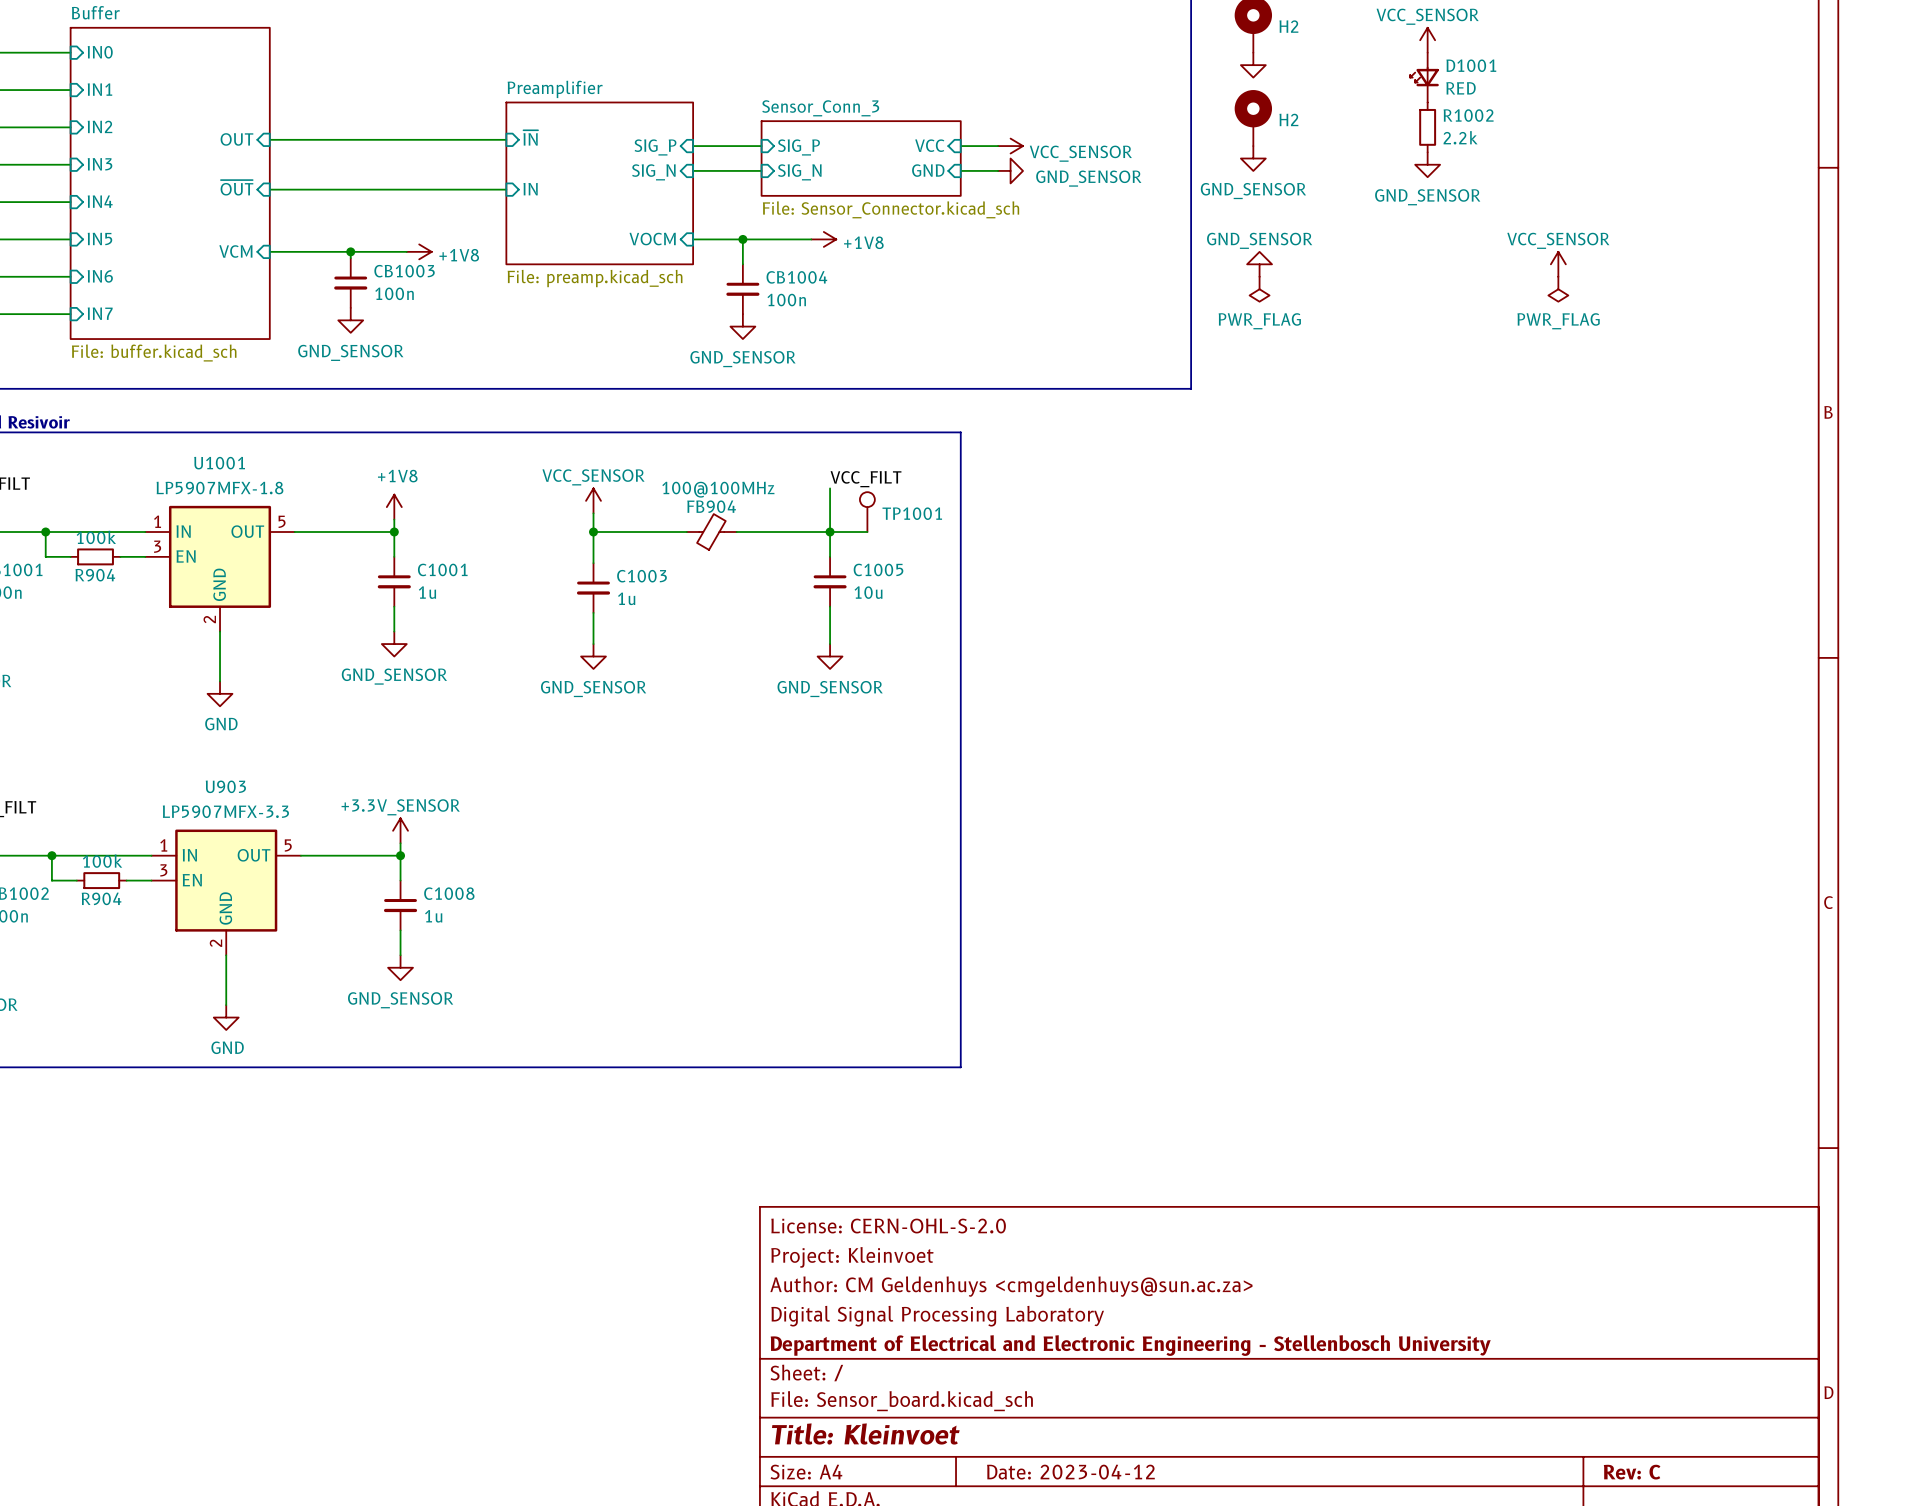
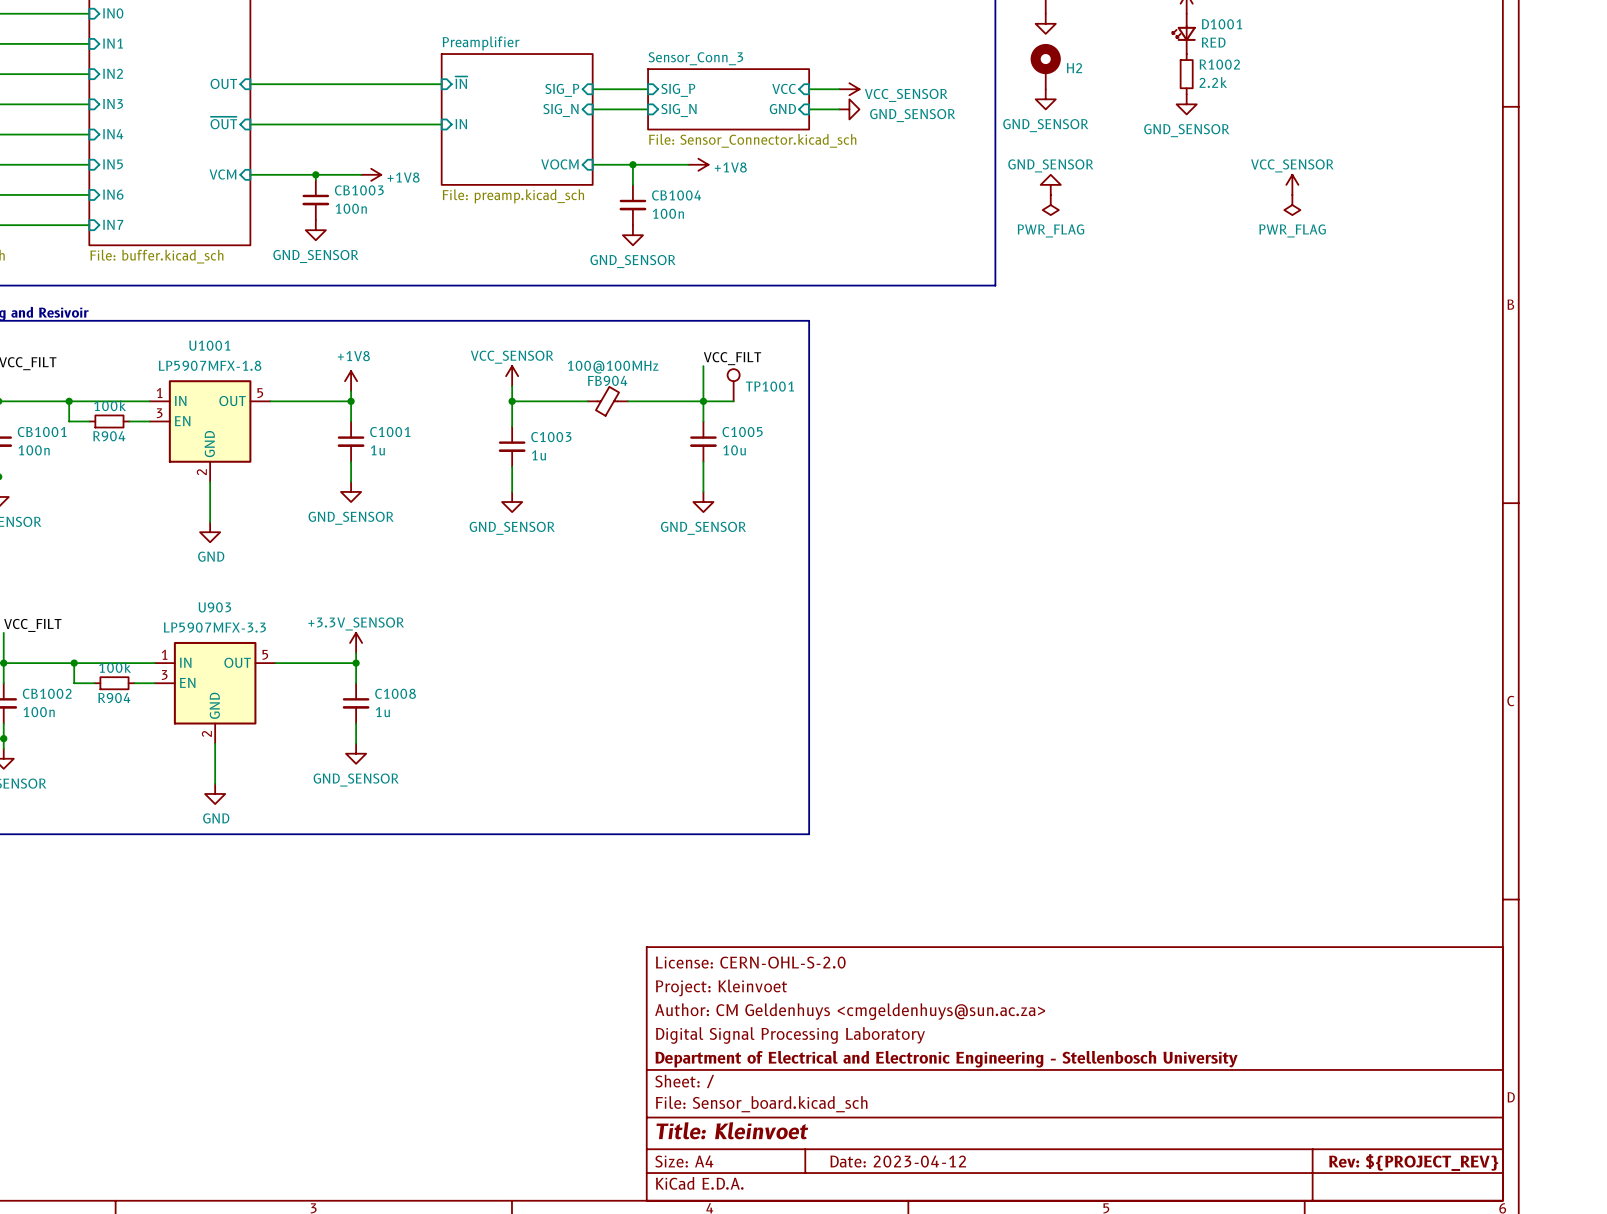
title block: Rev: C (1632, 1472) -> Rev: ${PROJECT_REV} (1413, 1162)

